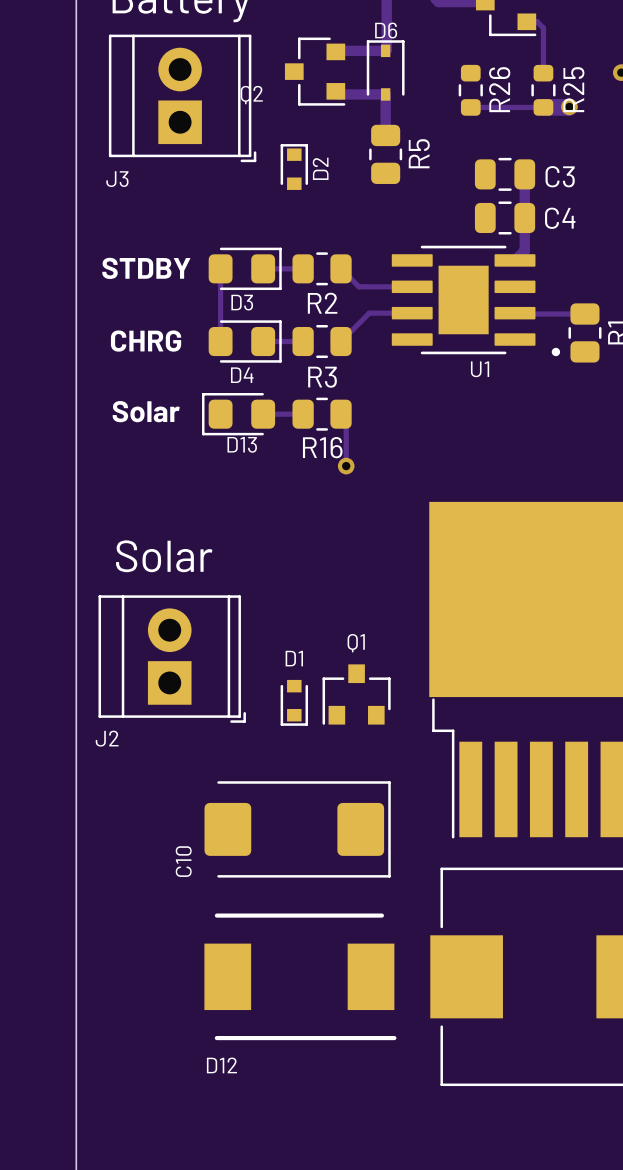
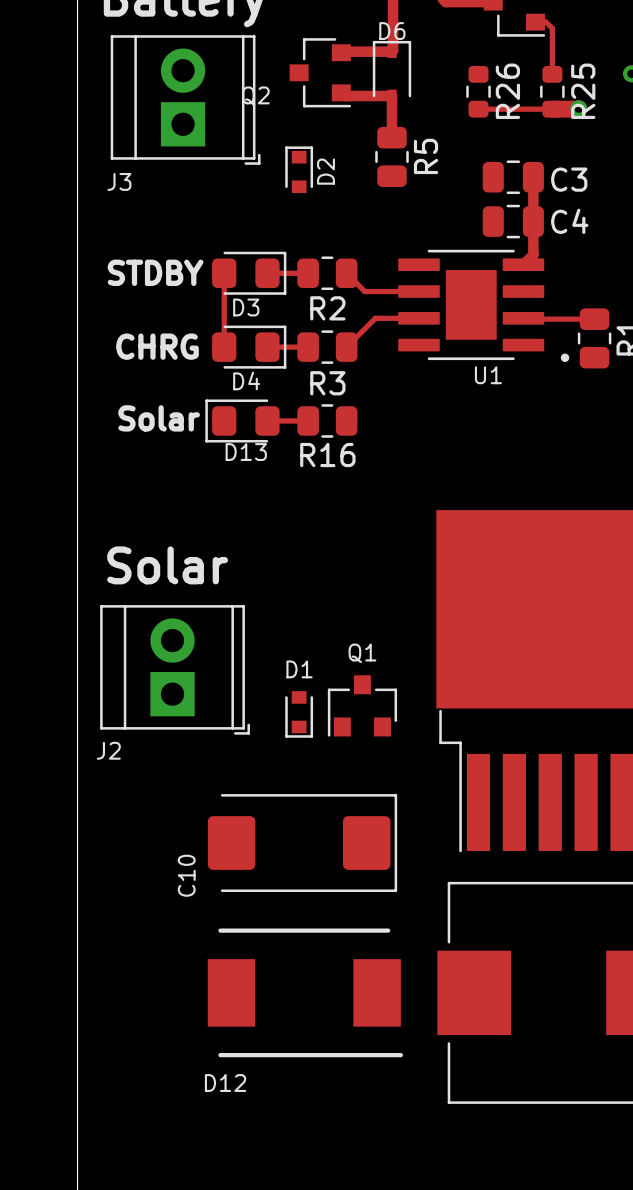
track: (341, 414) (346, 419) (346, 466) -> none
via: (346, 466) -> none

